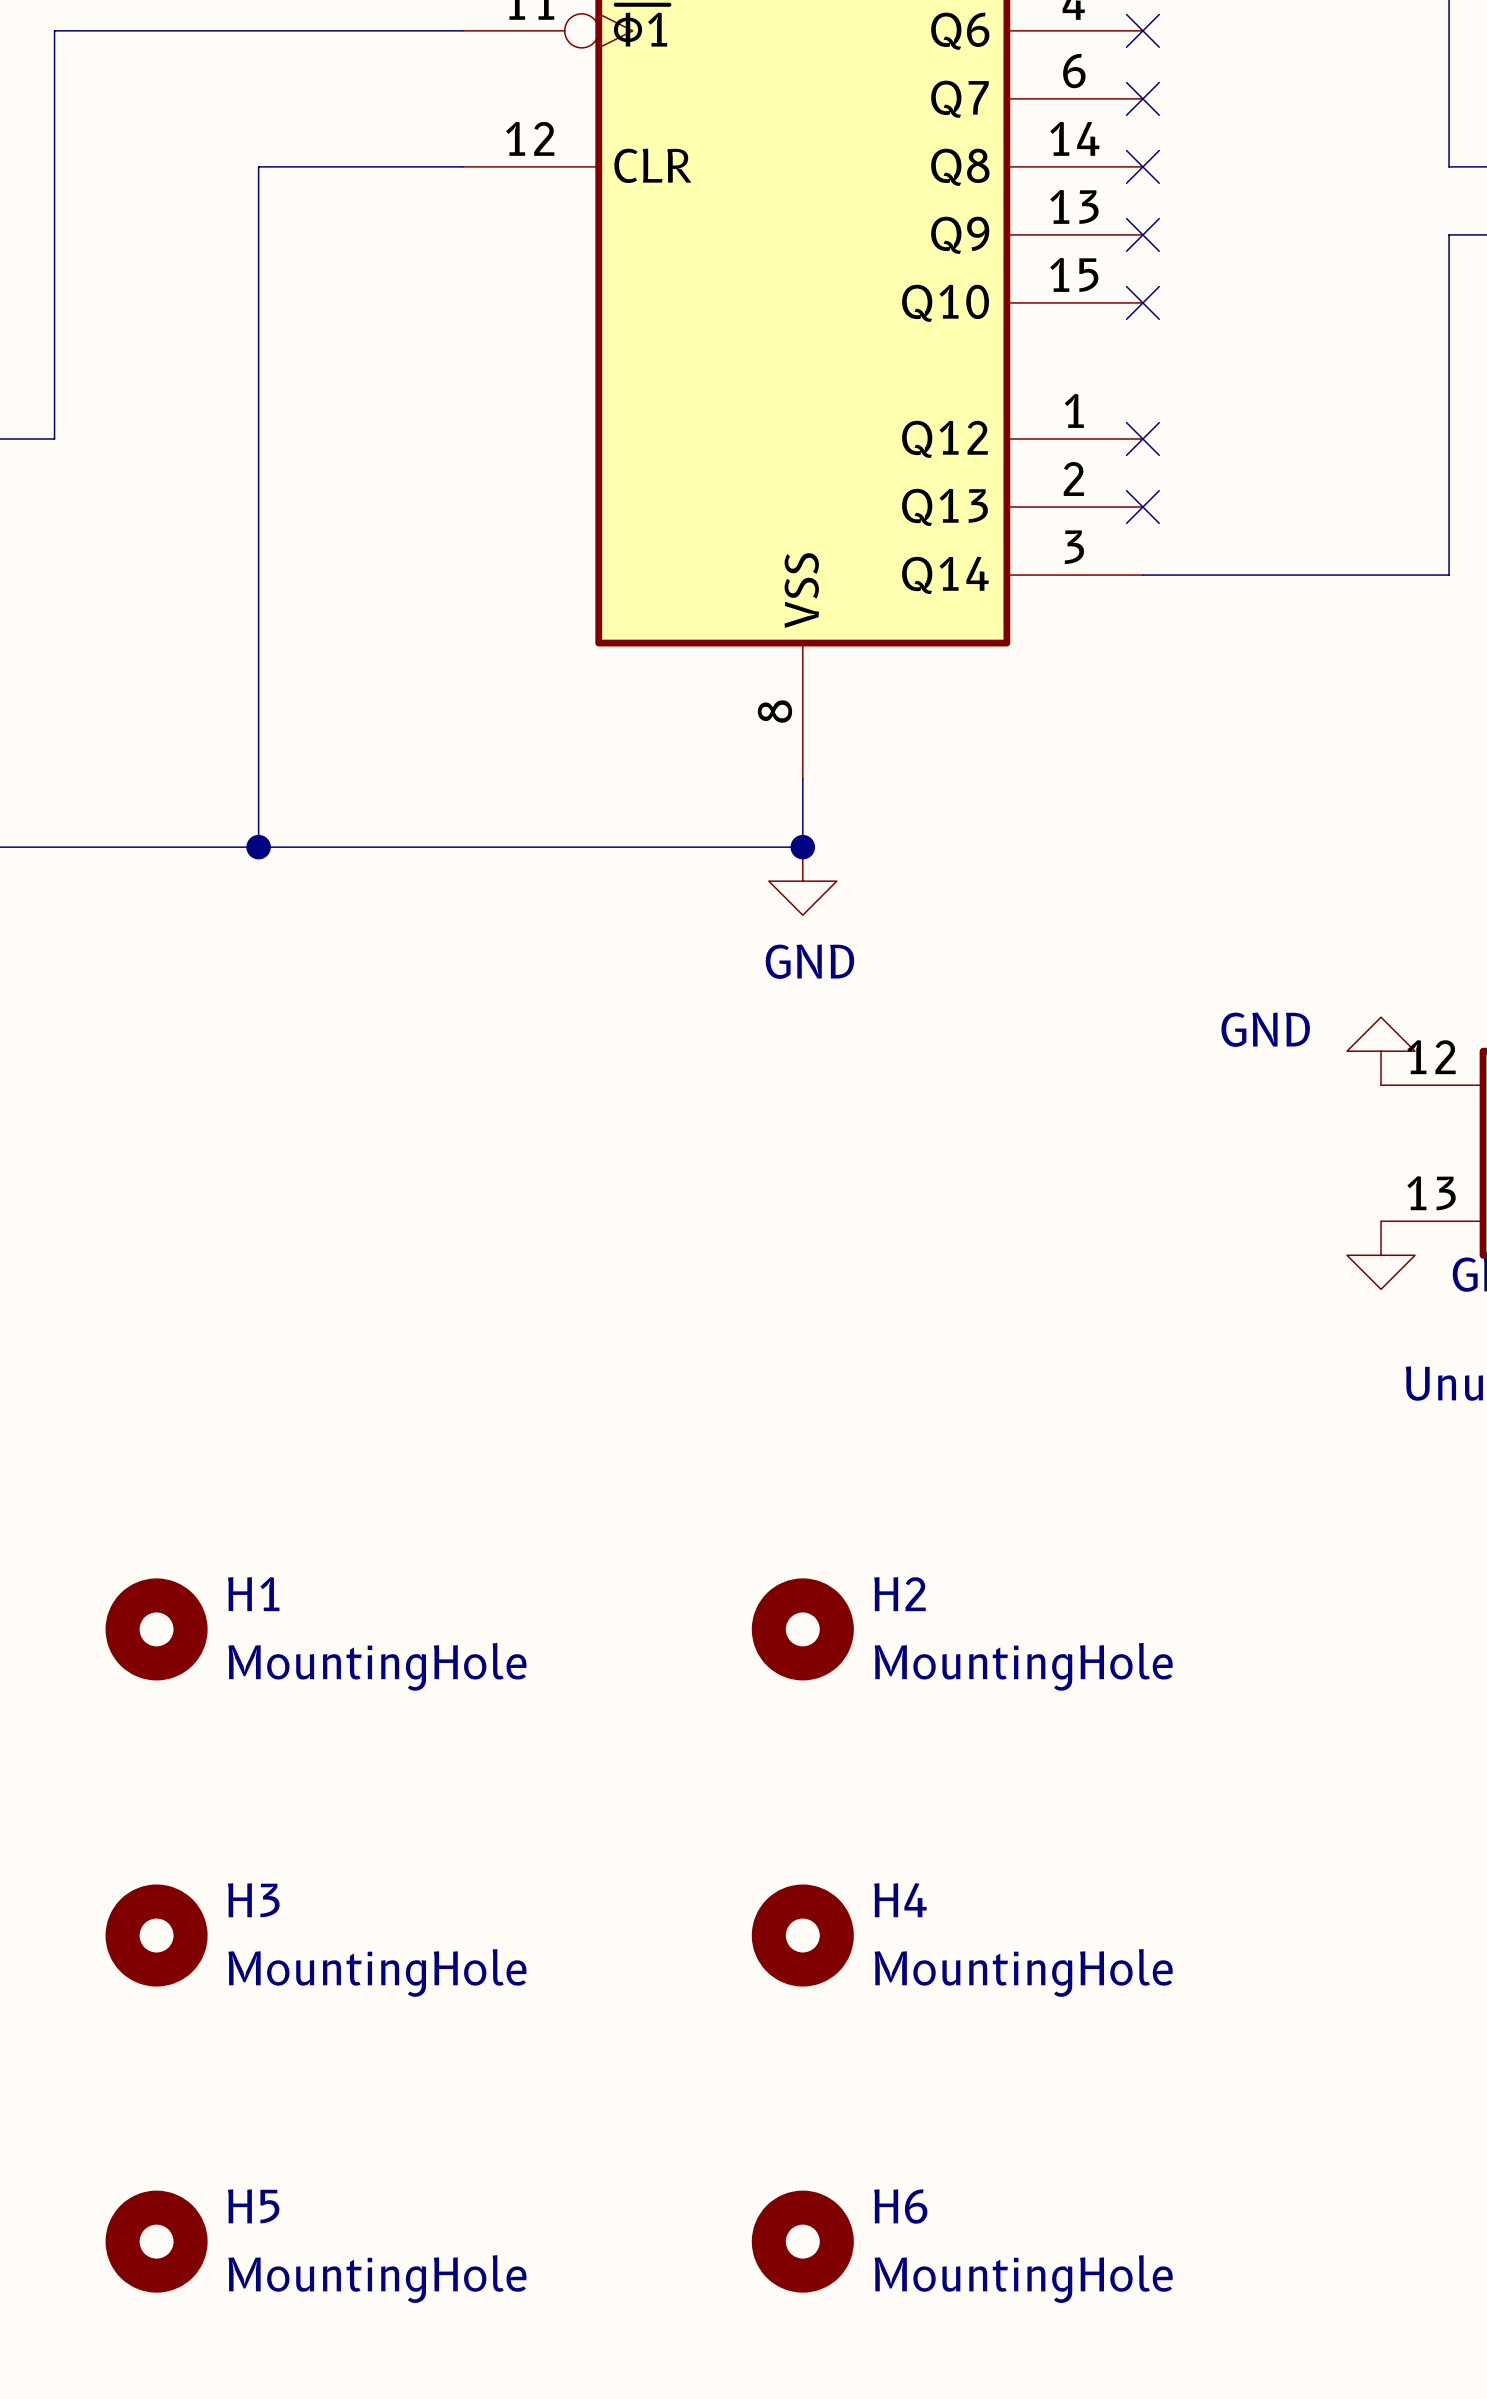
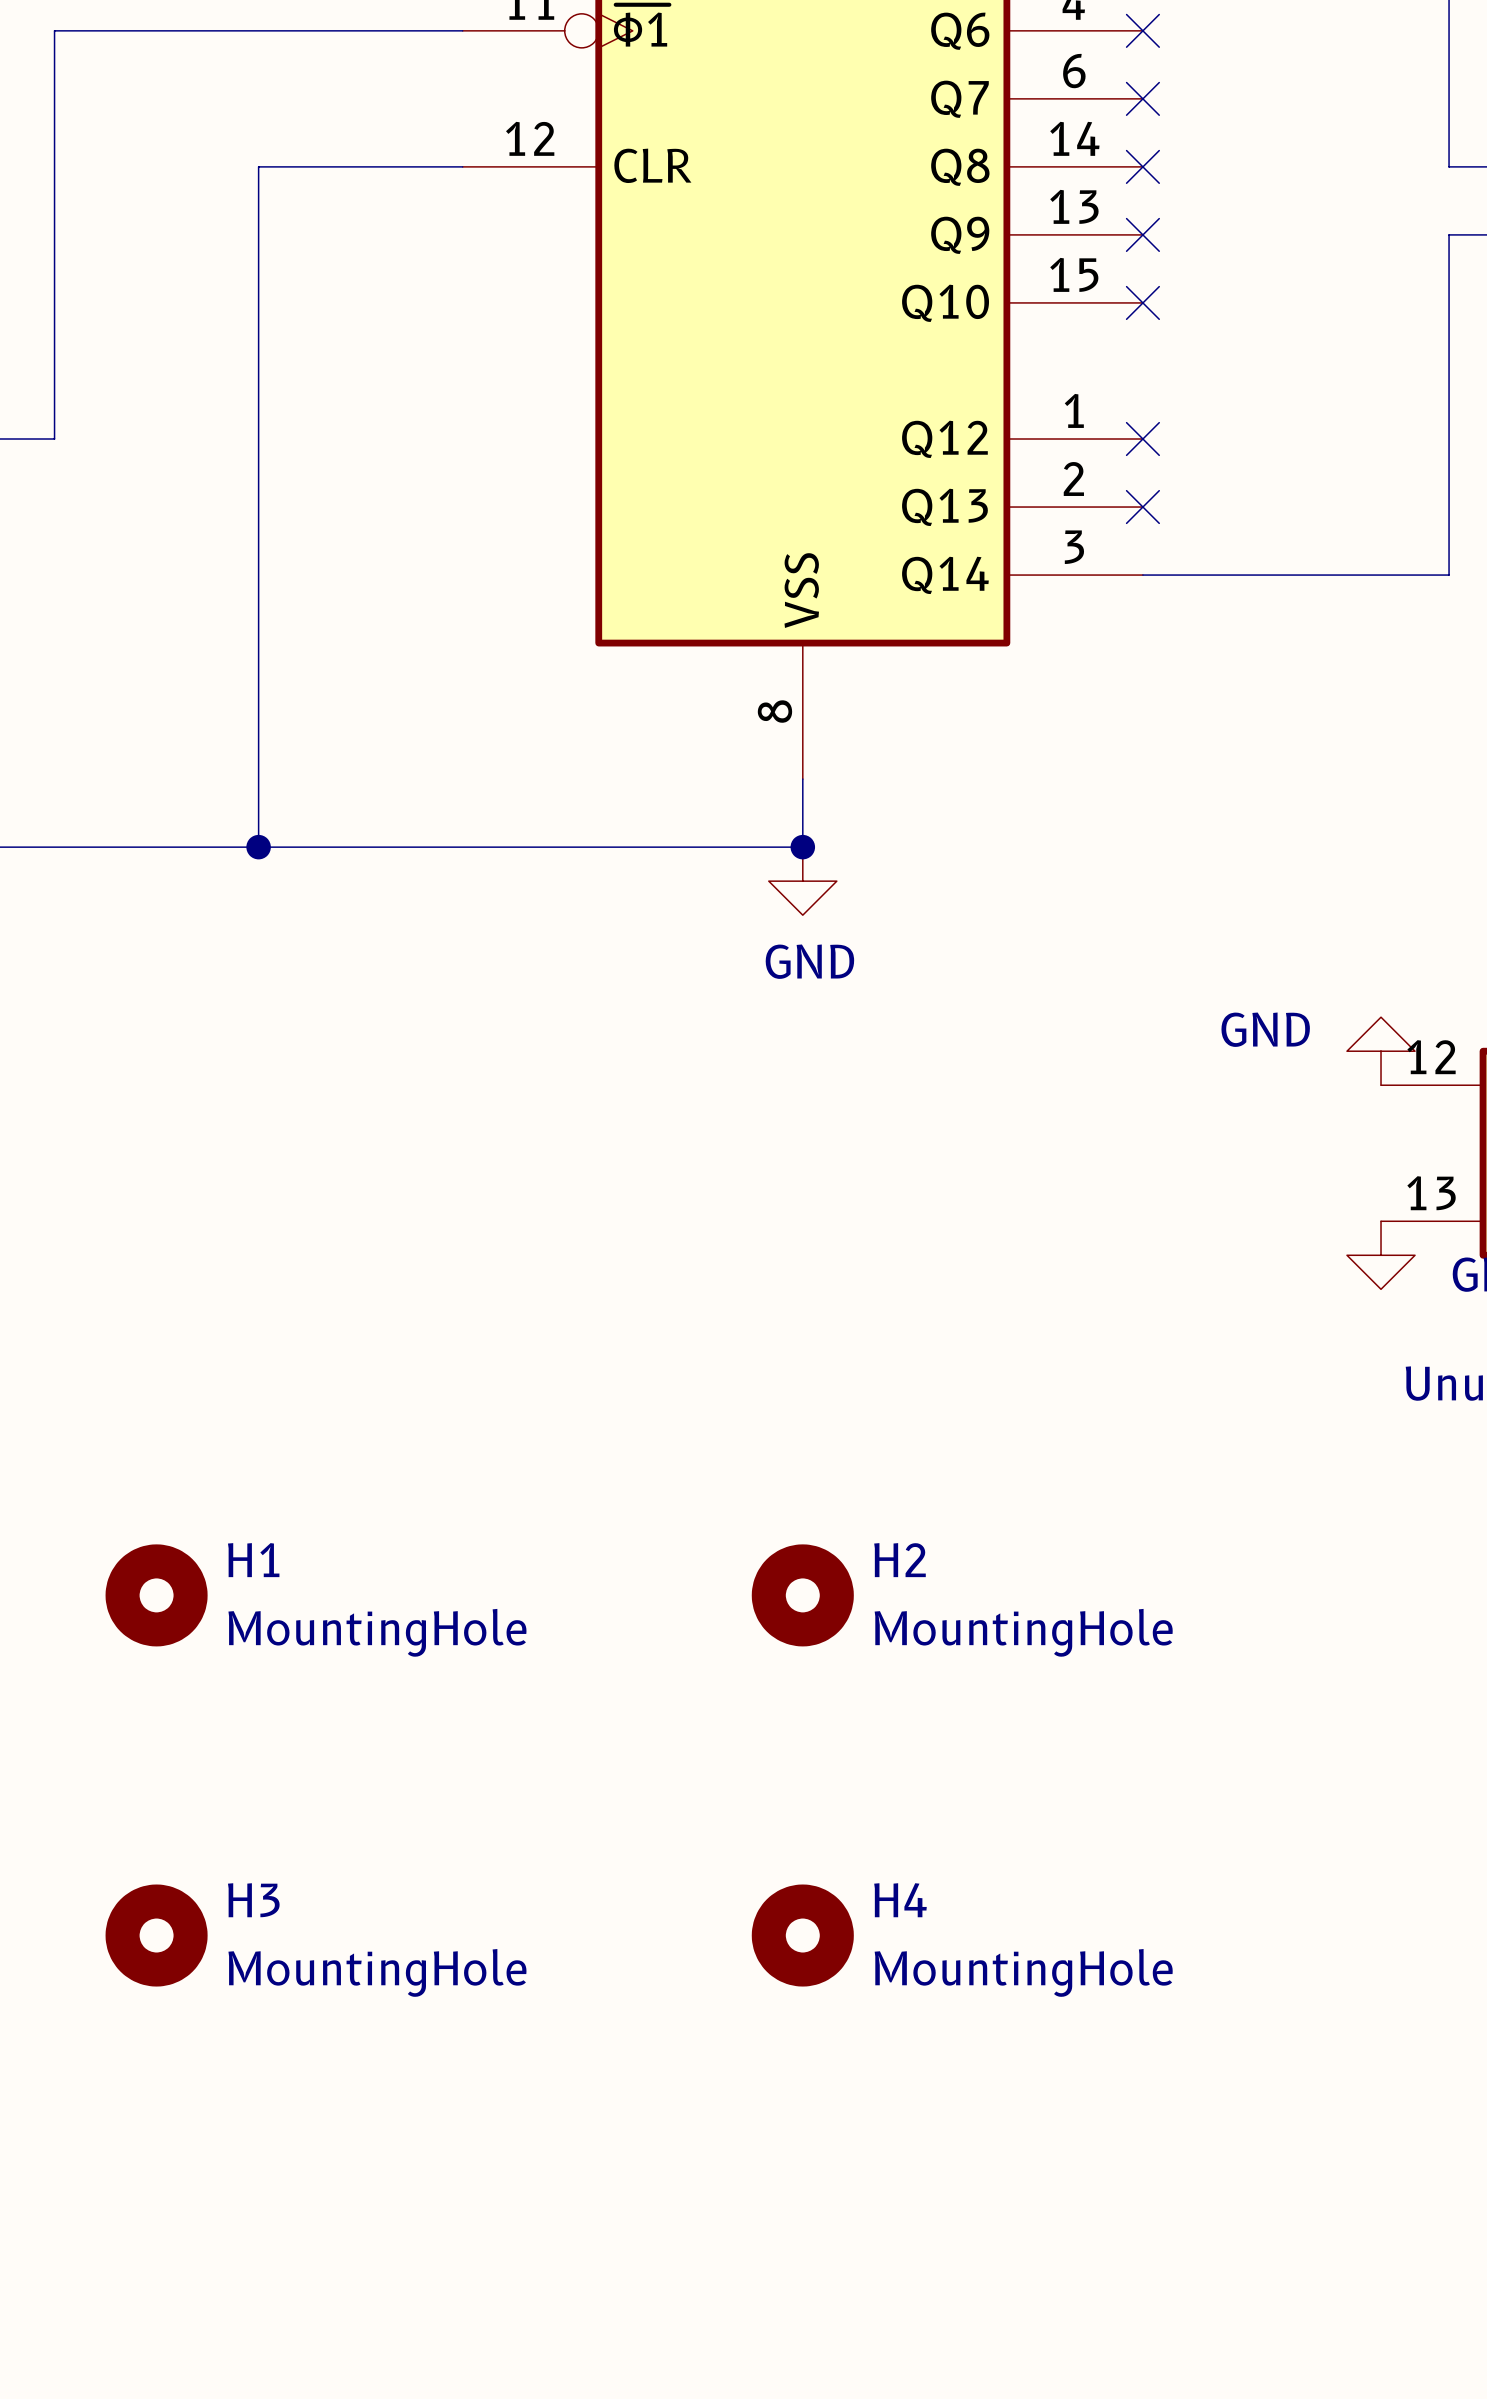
H1 position: (156, 1629) -> (156, 1595)
H2 position: (802, 1629) -> (802, 1595)
H5: MountingHole (156, 2241) -> none
H6: MountingHole (802, 2241) -> none

